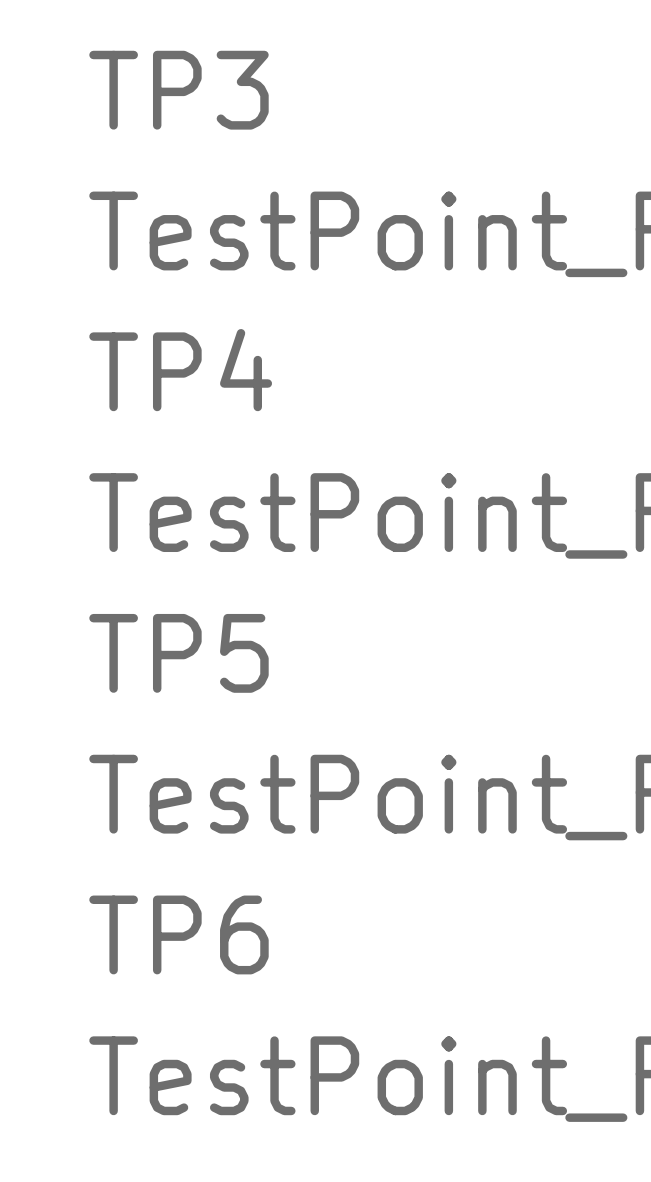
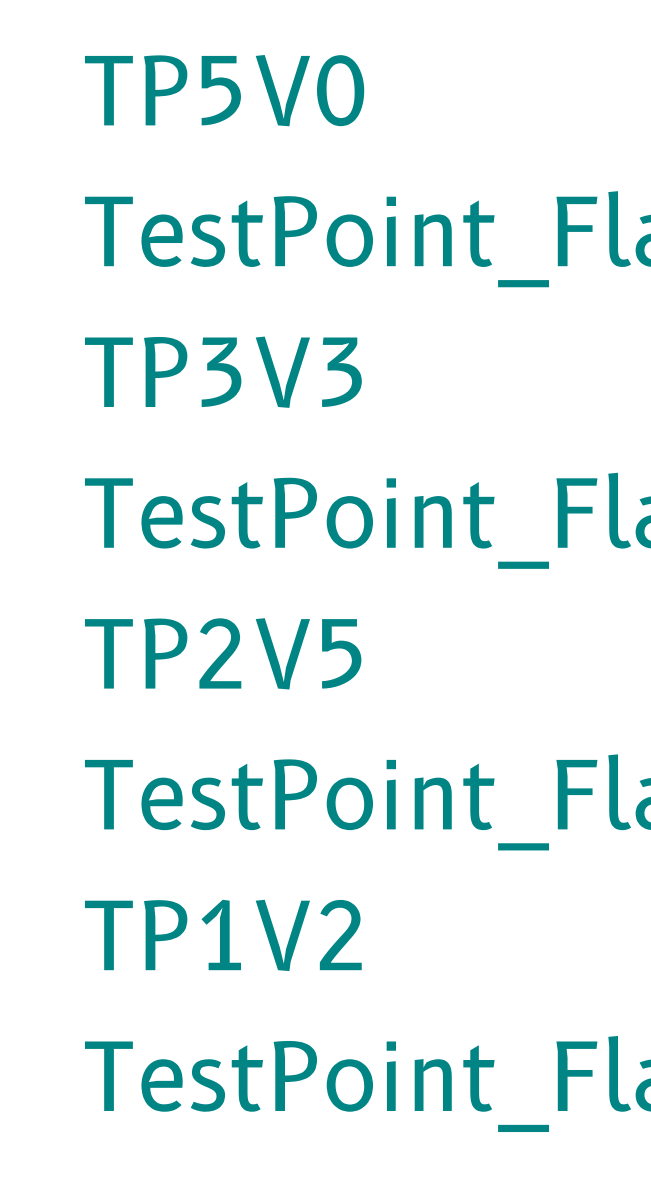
TP3 name: TP3 (178, 90) -> TP5V0 (224, 90)
TP4 name: TP4 (180, 370) -> TP3V3 (223, 372)
TP5 name: TP5 (178, 653) -> TP2V5 (223, 653)
TP6 name: TP6 (178, 934) -> TP1V2 (223, 935)

